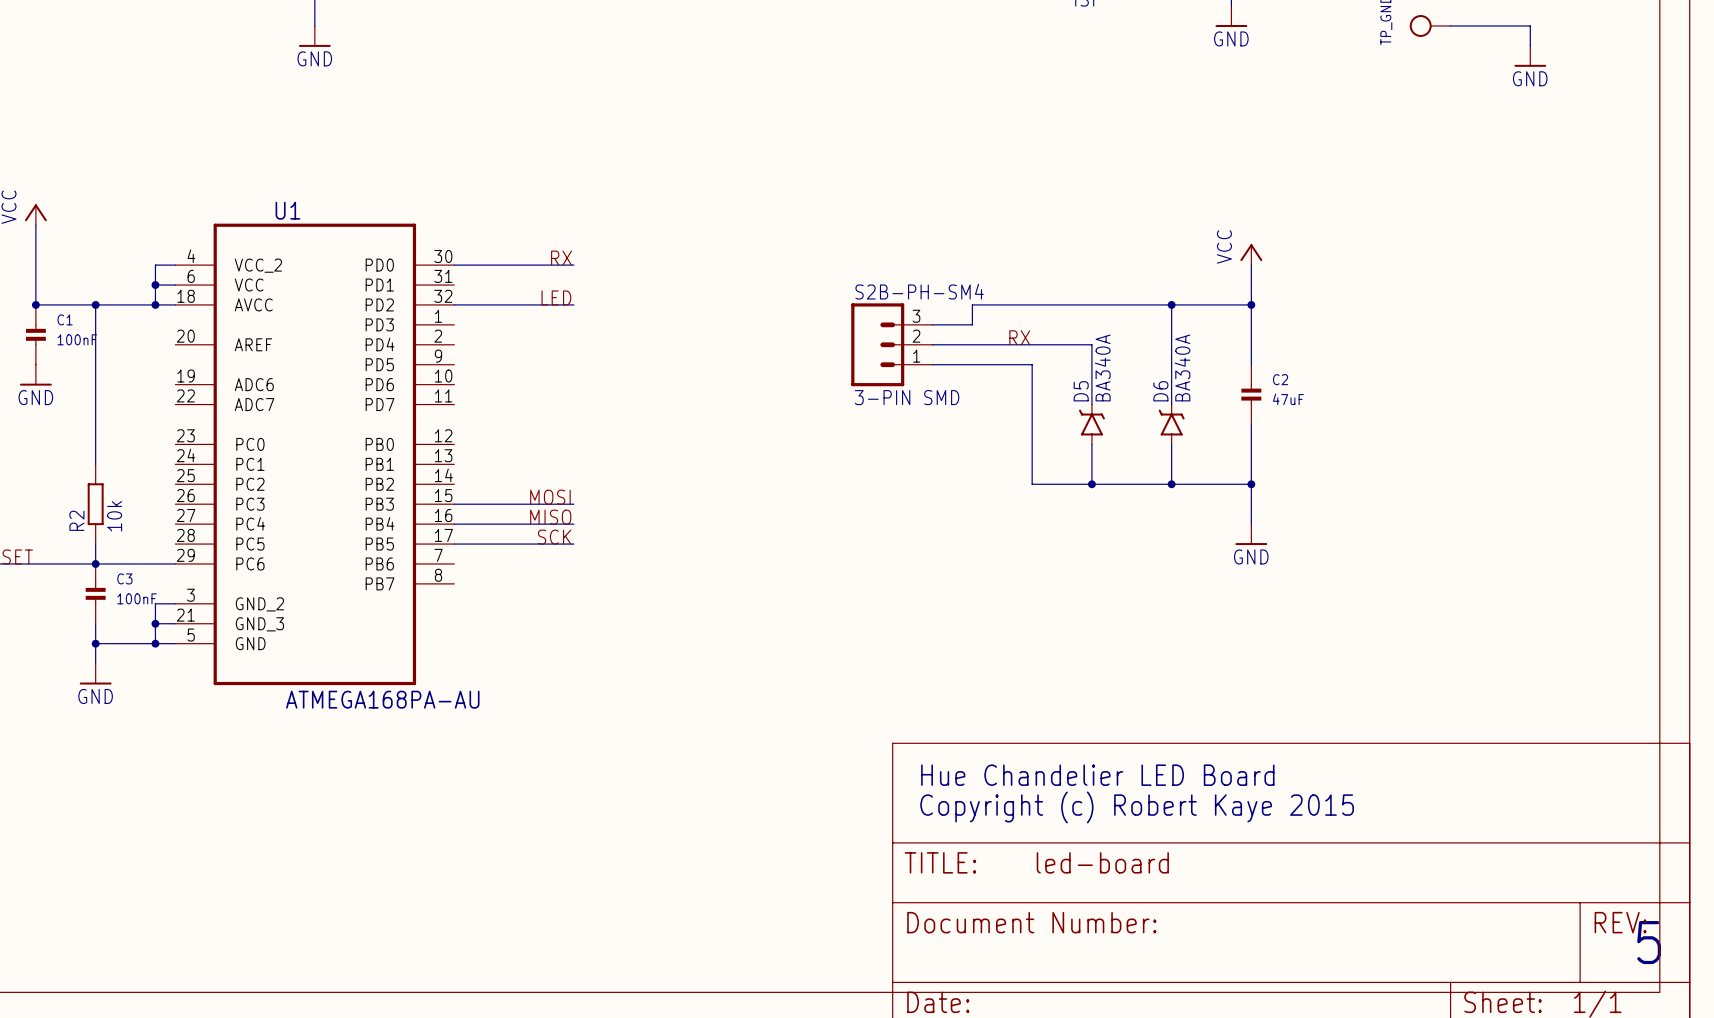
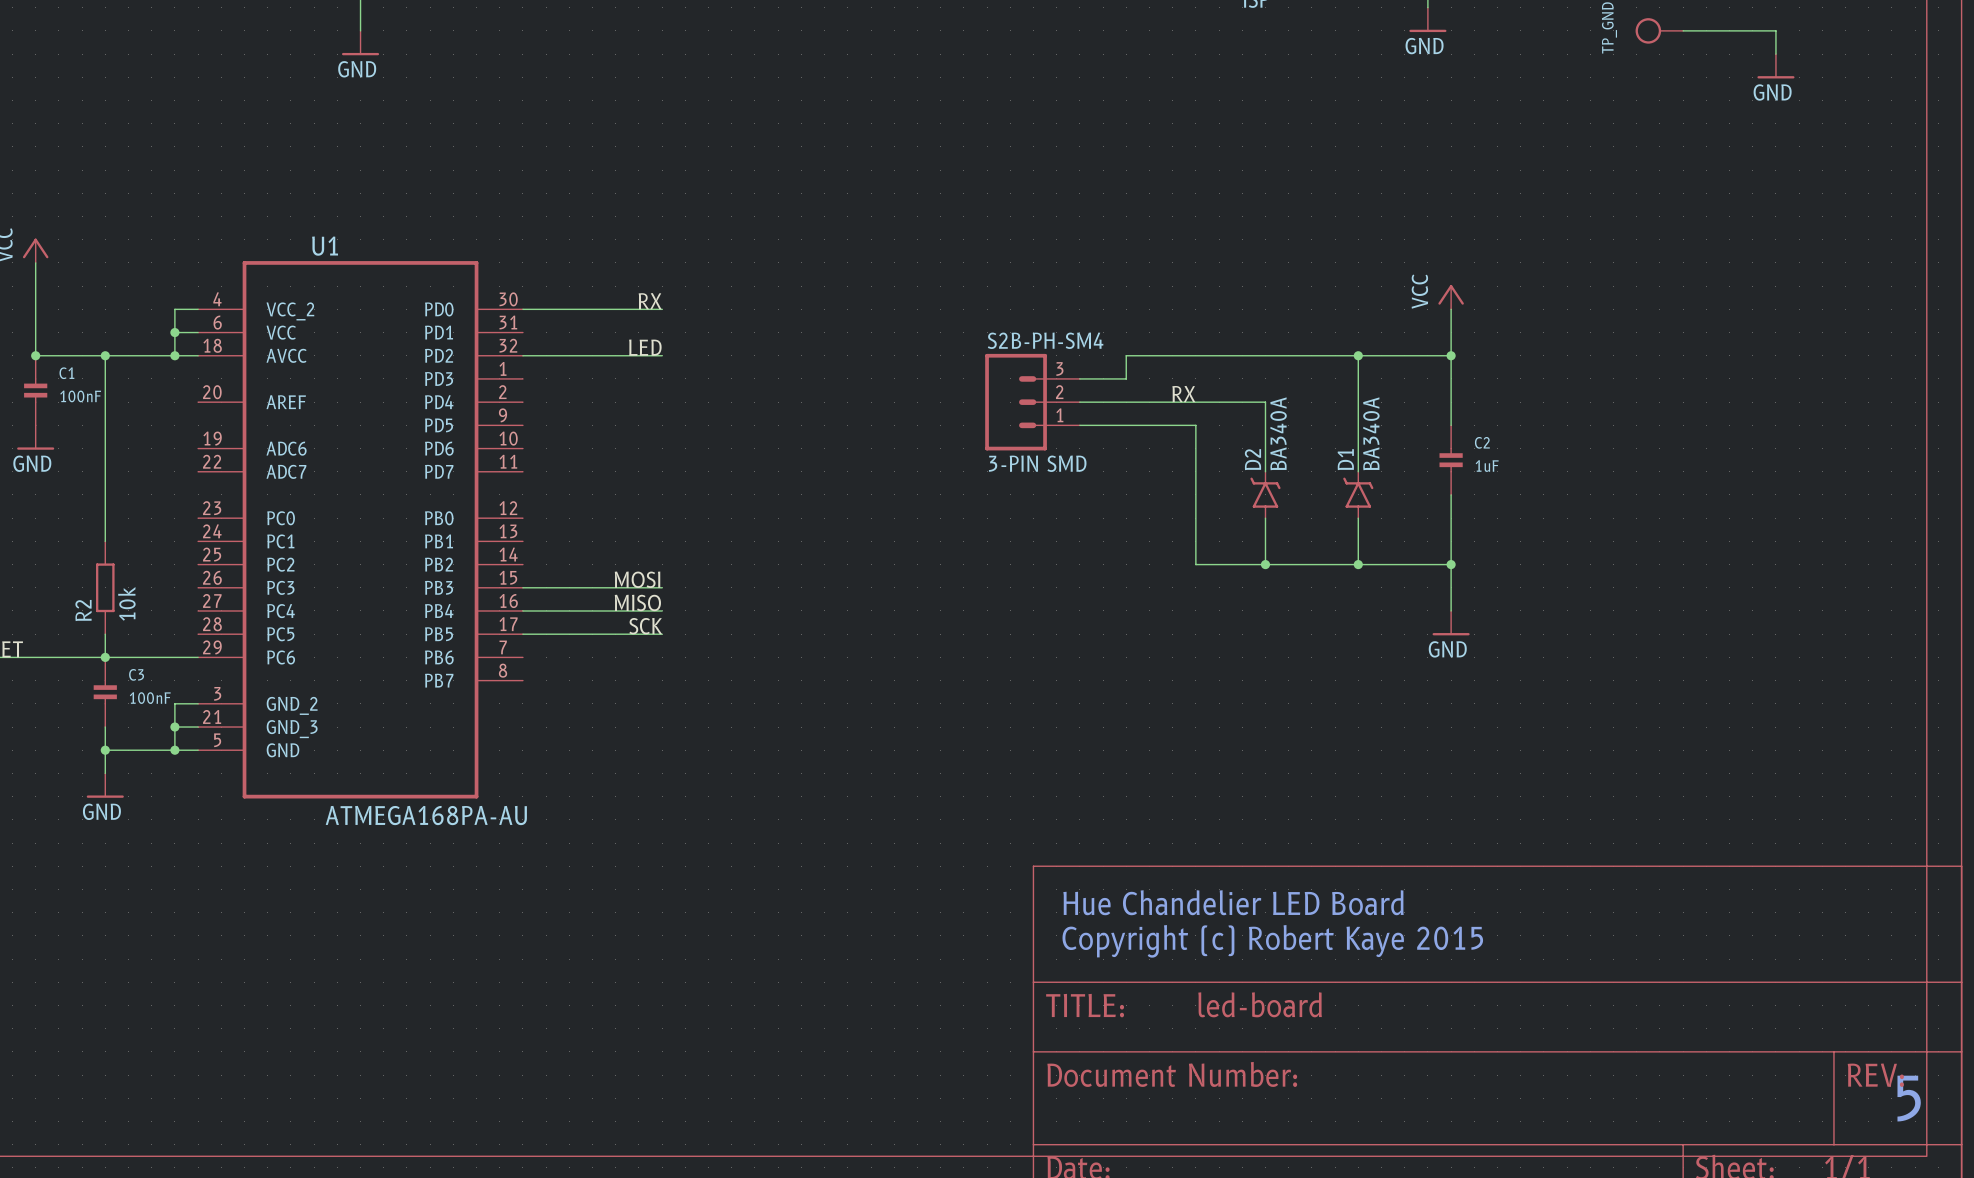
D5 name: D5 (1081, 391) -> D2 (1252, 459)
D6 name: D6 (1160, 391) -> D1 (1345, 459)
C2 value: 47uF (1288, 399) -> 1uF (1487, 466)

